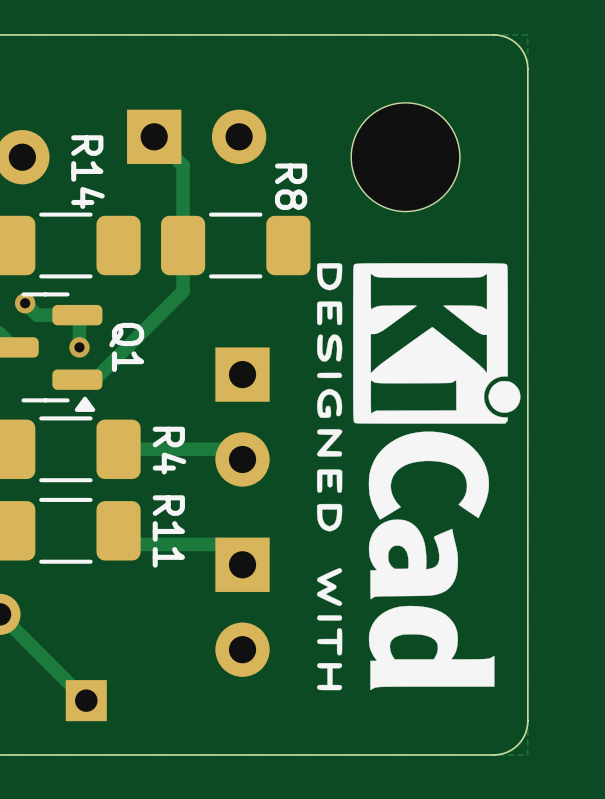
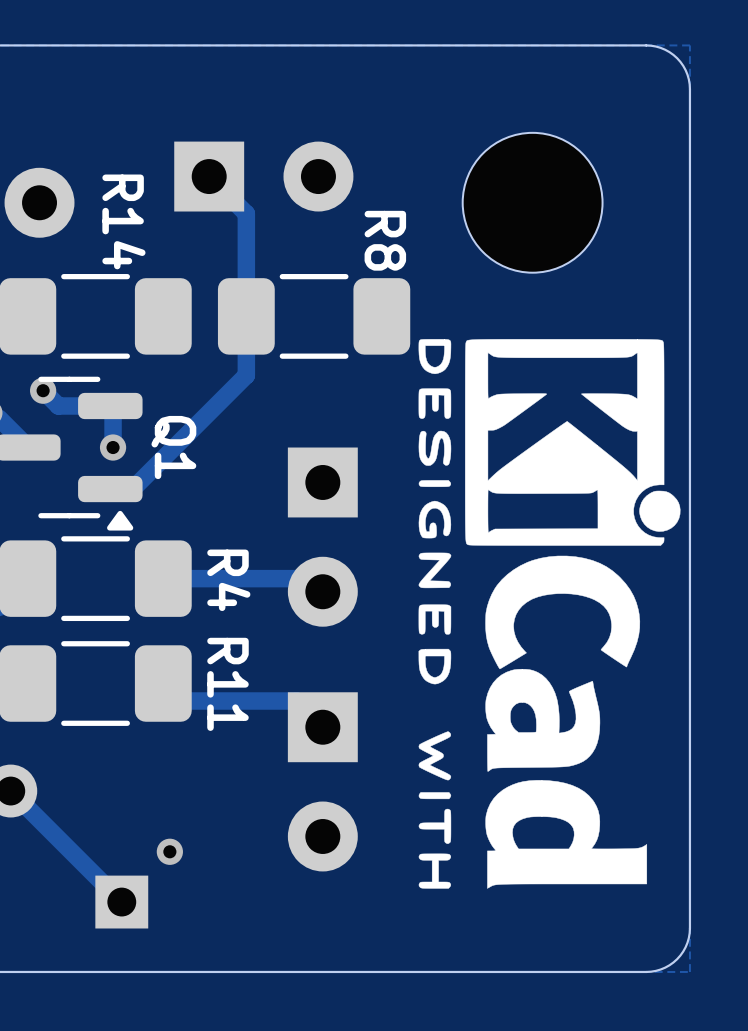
via: none -> (169, 851)

